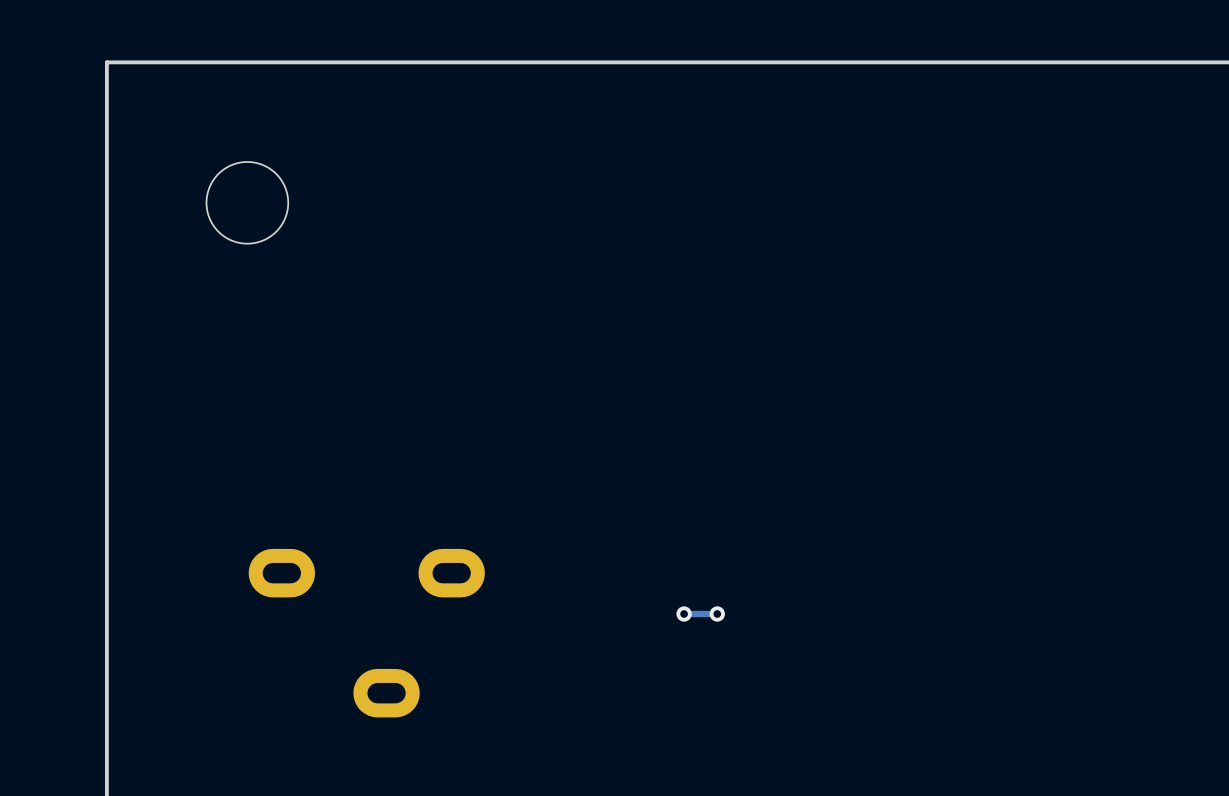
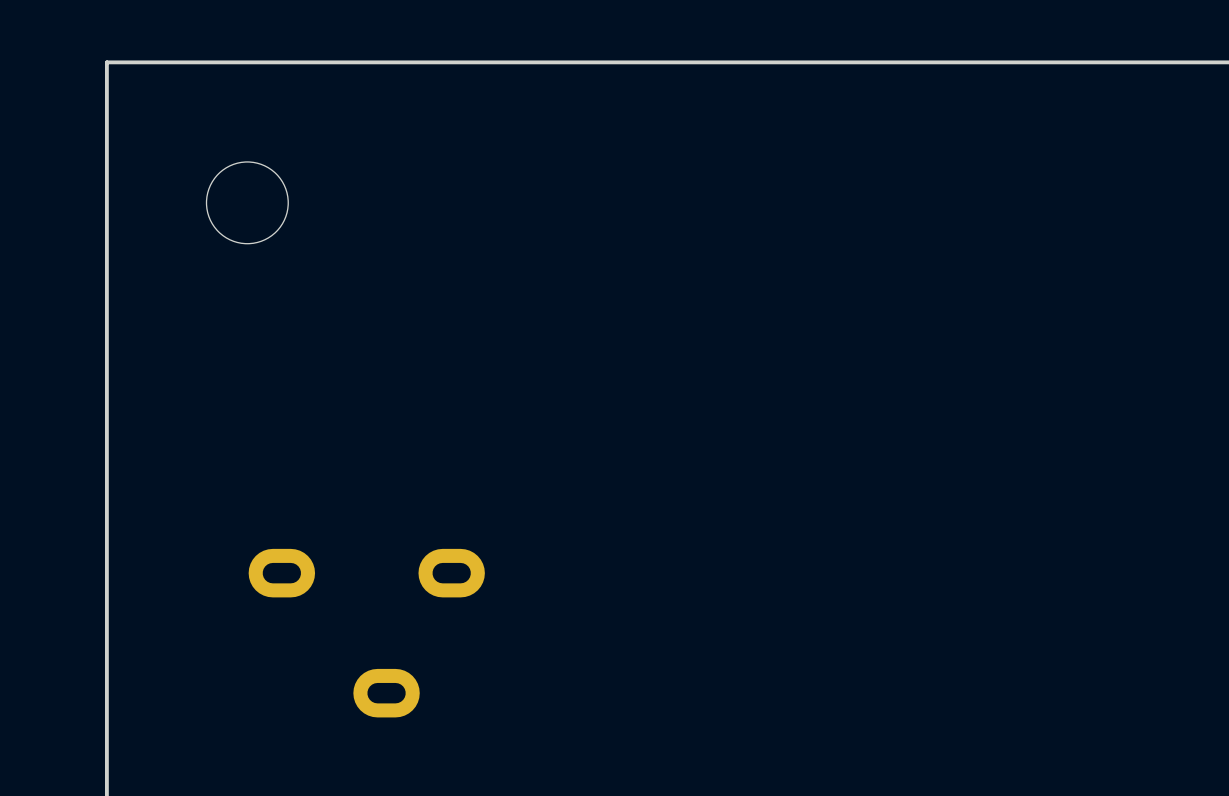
via: (684, 614) -> none
track: (717, 614) (684, 614) -> none
via: (717, 614) -> none

